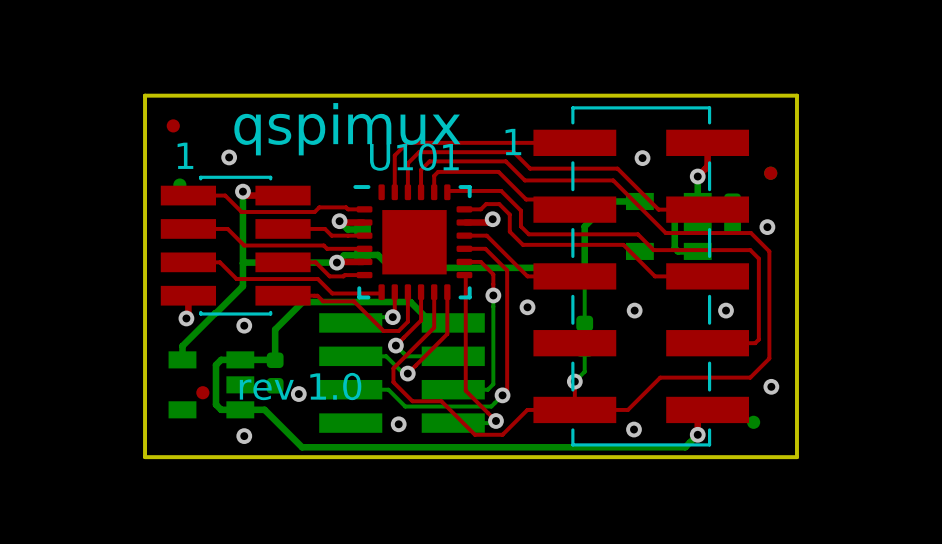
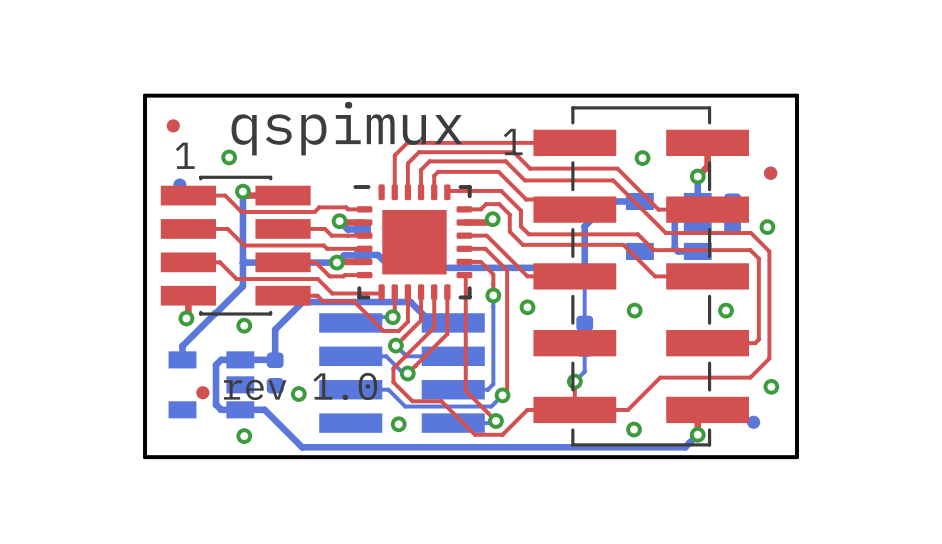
U101 name: U101 (414, 157) -> none

